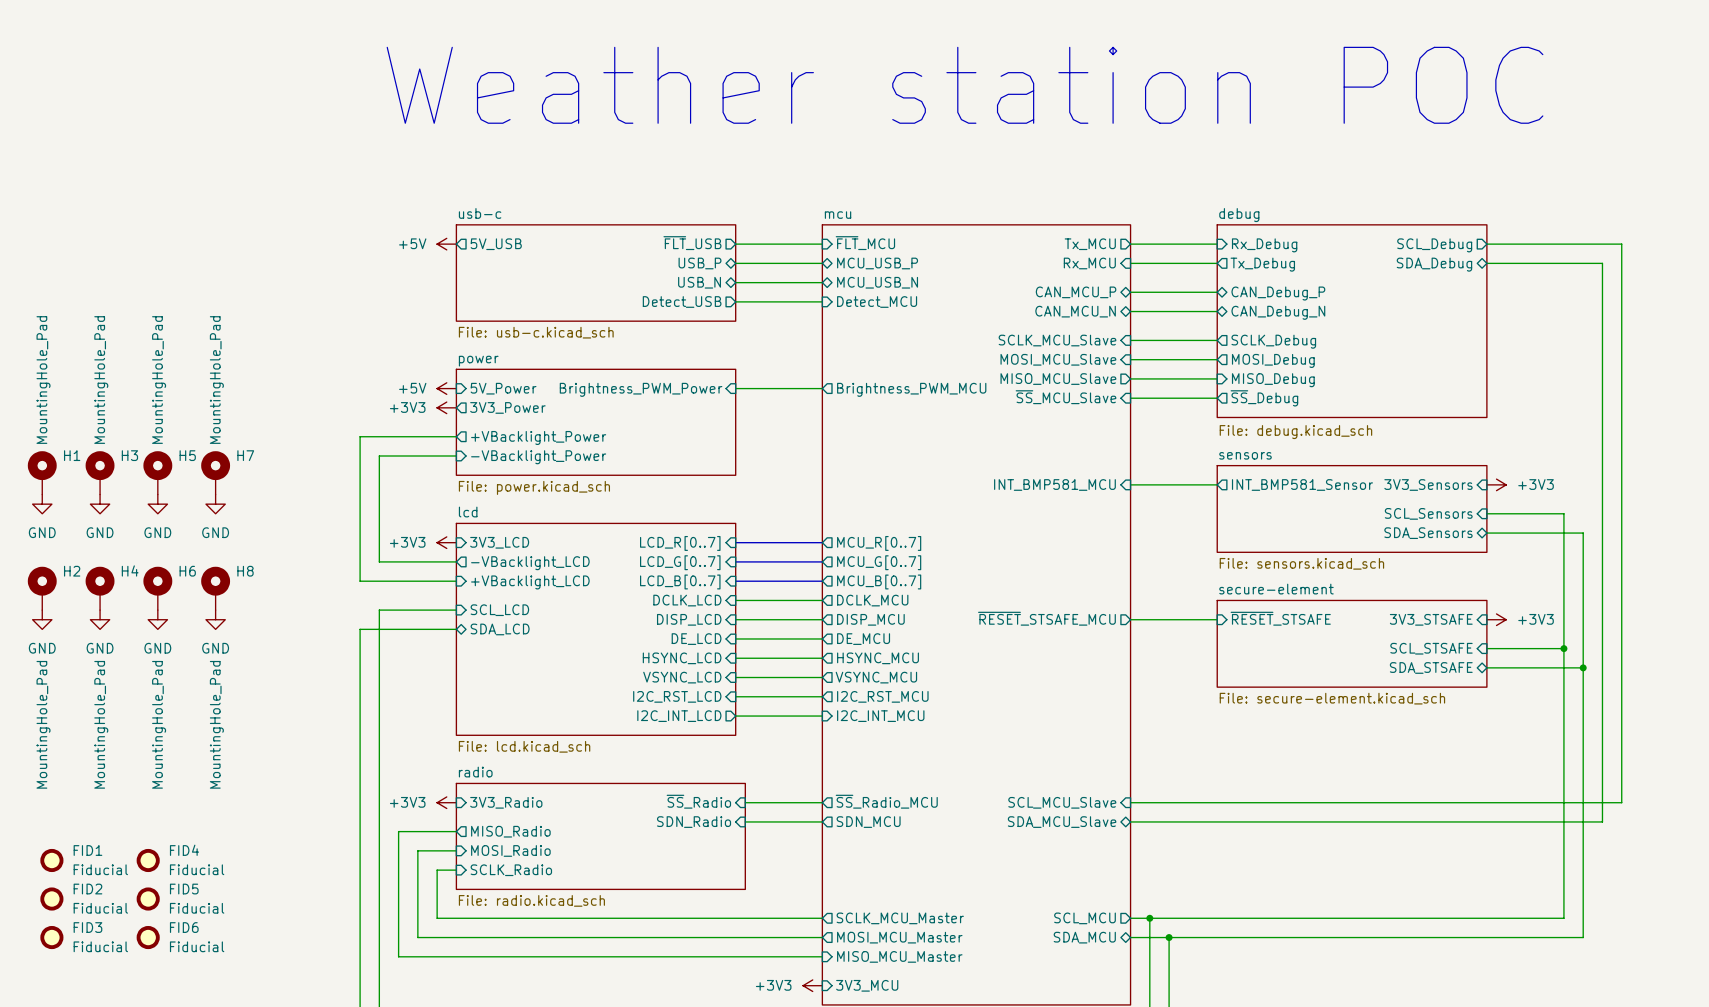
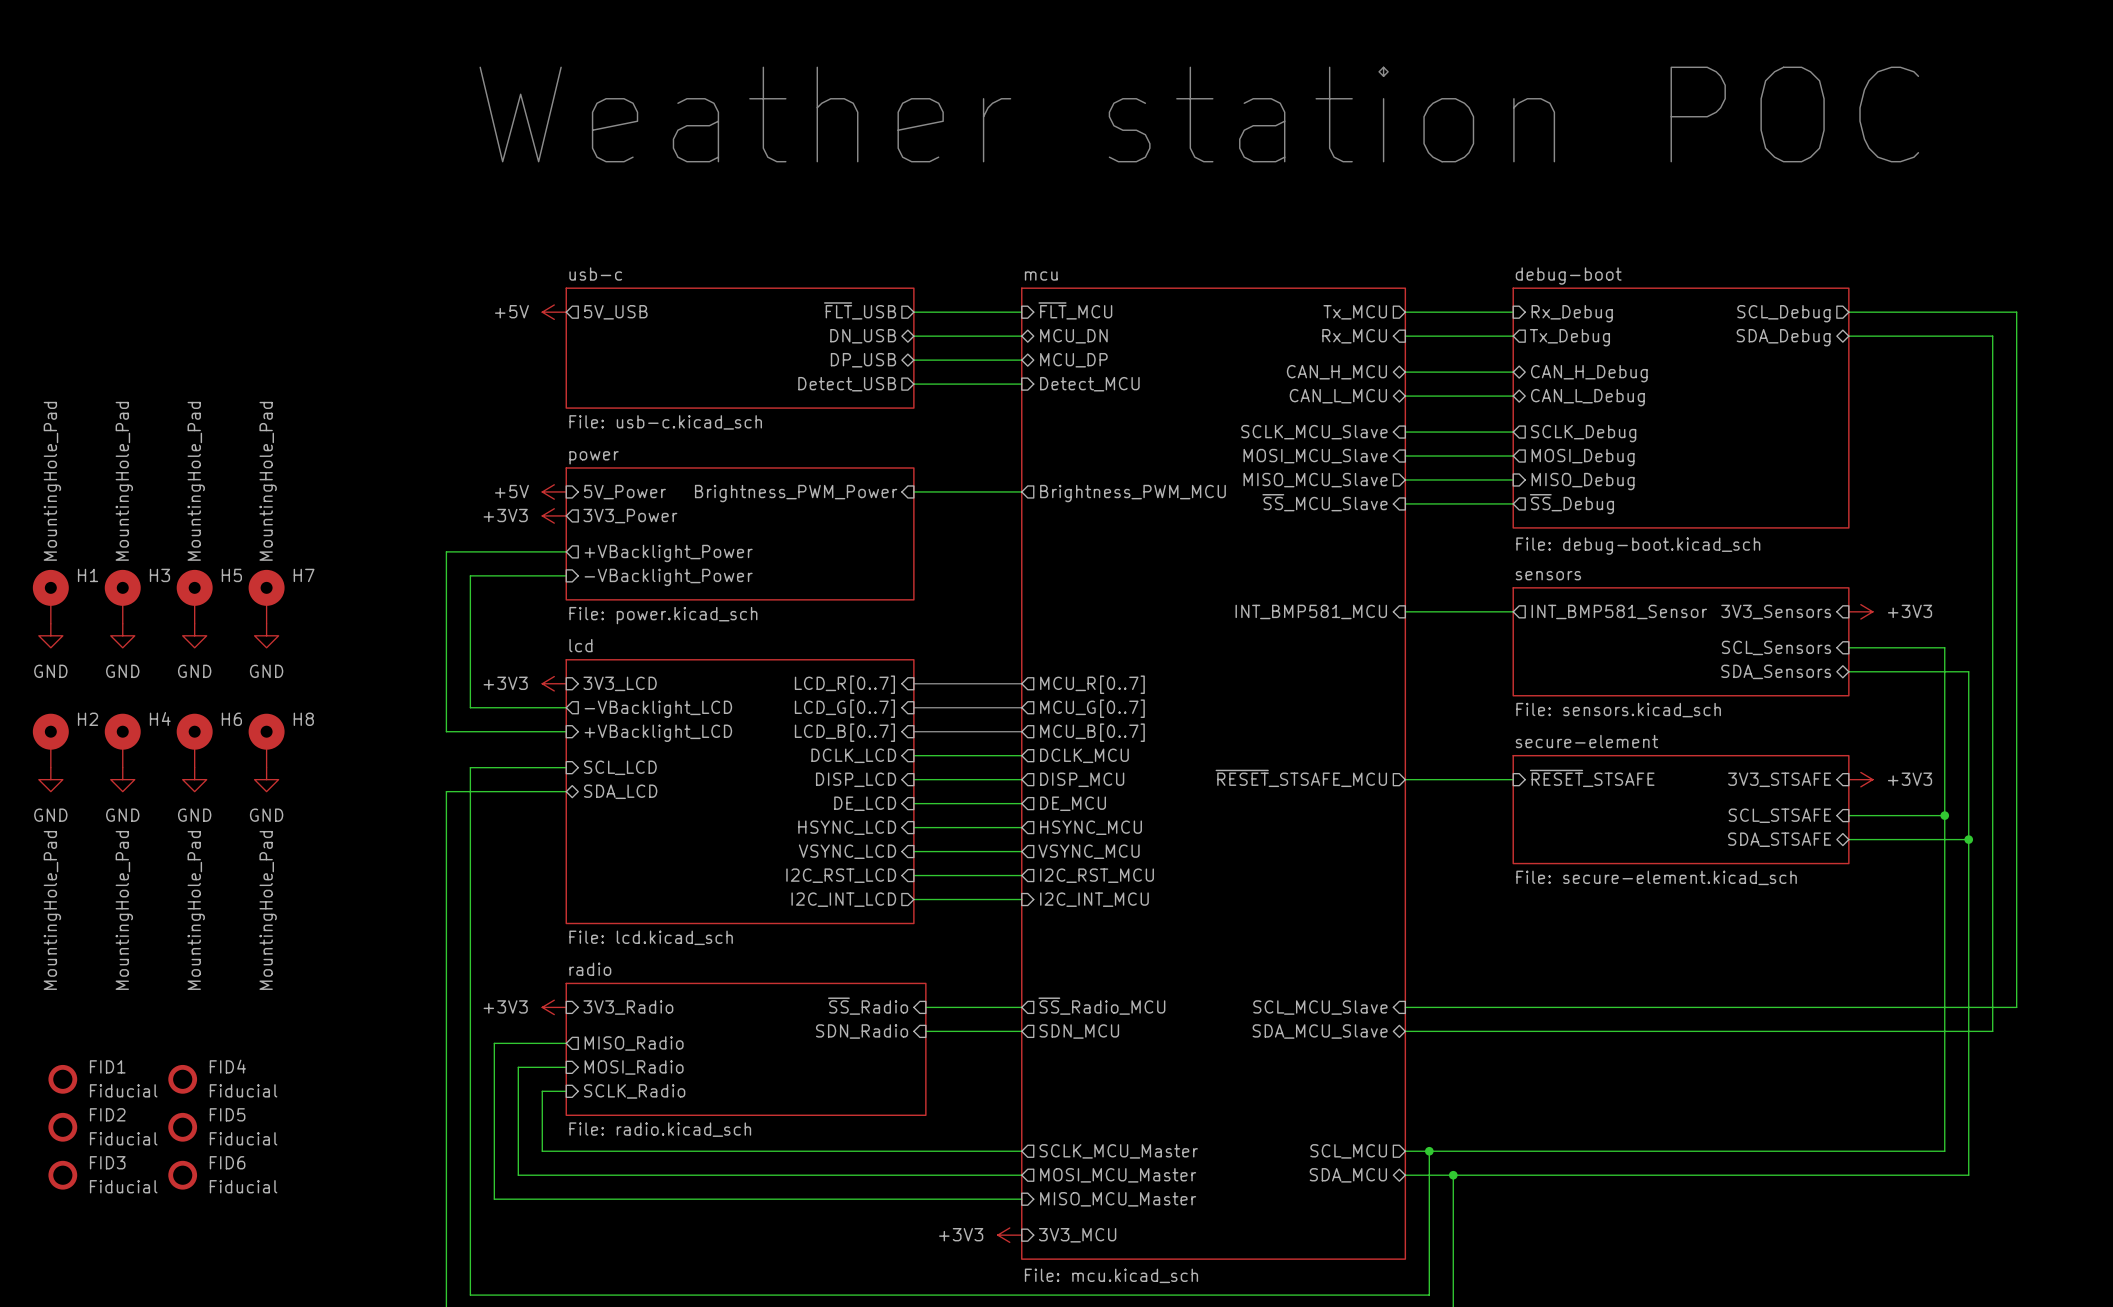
sheet debug name: debug (1239, 215) -> debug-boot (1568, 276)
sheet pin: USB_P (699, 263) -> DN_USB (863, 336)
sheet pin: MCU_USB_P (877, 263) -> MCU_DN (1073, 336)
sheet pin: USB_N (699, 282) -> DP_USB (863, 360)
sheet pin: MCU_USB_N (877, 282) -> MCU_DP (1073, 360)
sheet pin: CAN_MCU_P (1076, 292) -> CAN_H_MCU (1336, 372)
sheet pin: CAN_Debug_P (1278, 293) -> CAN_H_Debug (1589, 373)
sheet pin: CAN_MCU_N (1075, 311) -> CAN_L_MCU (1338, 396)
sheet pin: CAN_Debug_N (1278, 312) -> CAN_L_Debug (1587, 397)
sheet debug value: File: debug.kicad_sch (1295, 432) -> File: debug-boot.kicad_sch (1638, 546)

